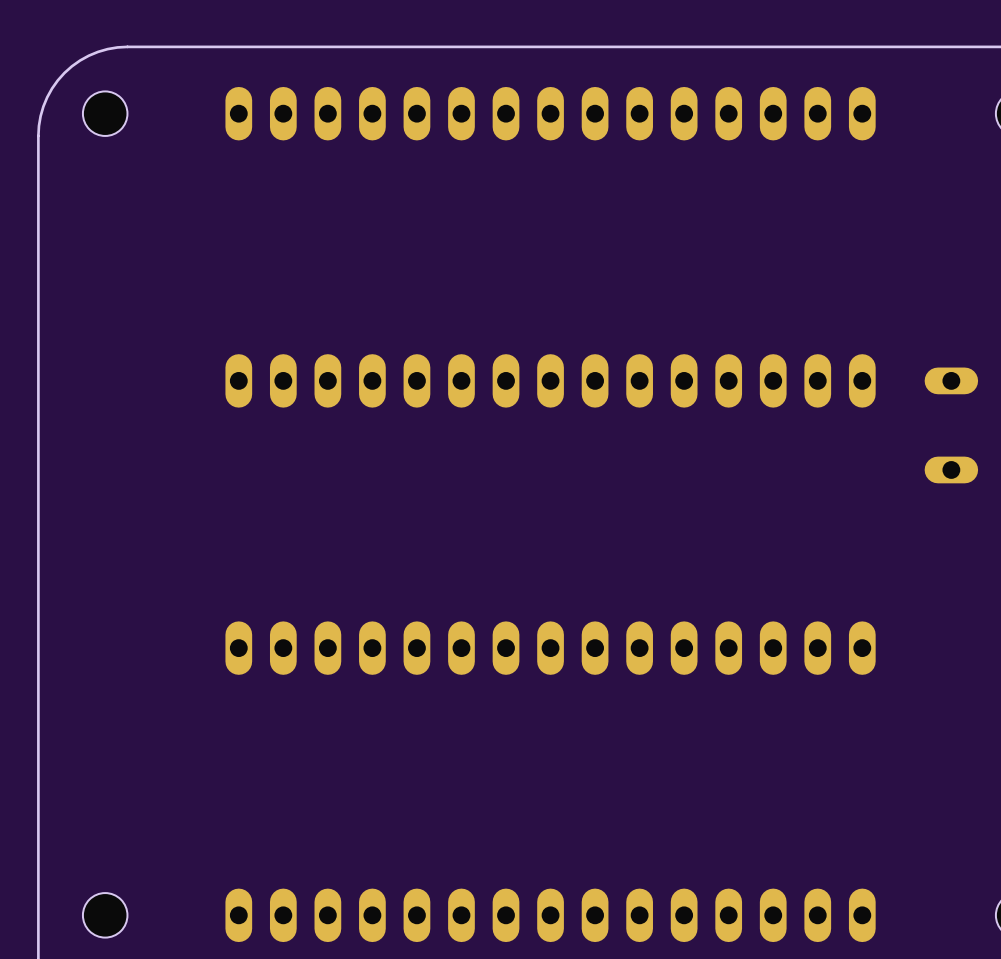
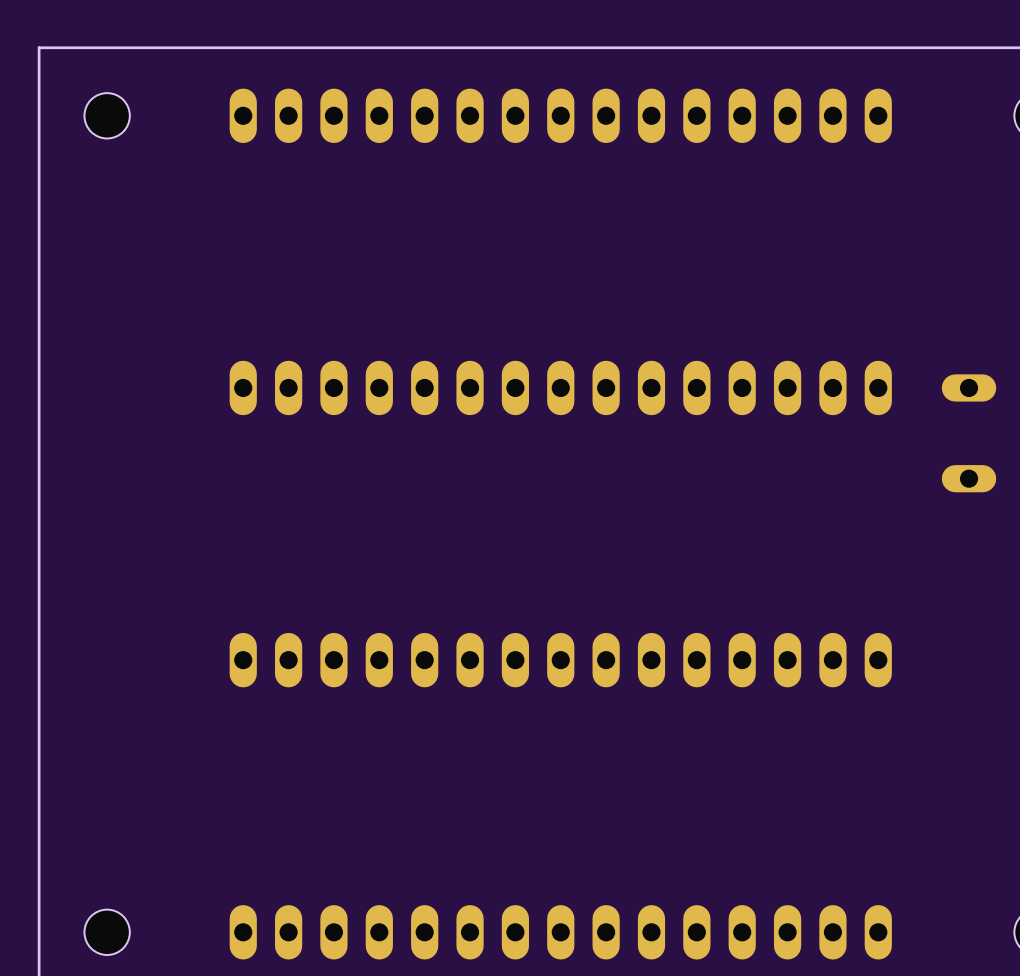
board edge: (127, 46) (107, 49) (88, 55) (64, 72) (47, 97) (40, 116) (38, 135) -> (129, 47) (39, 47) (39, 138)

